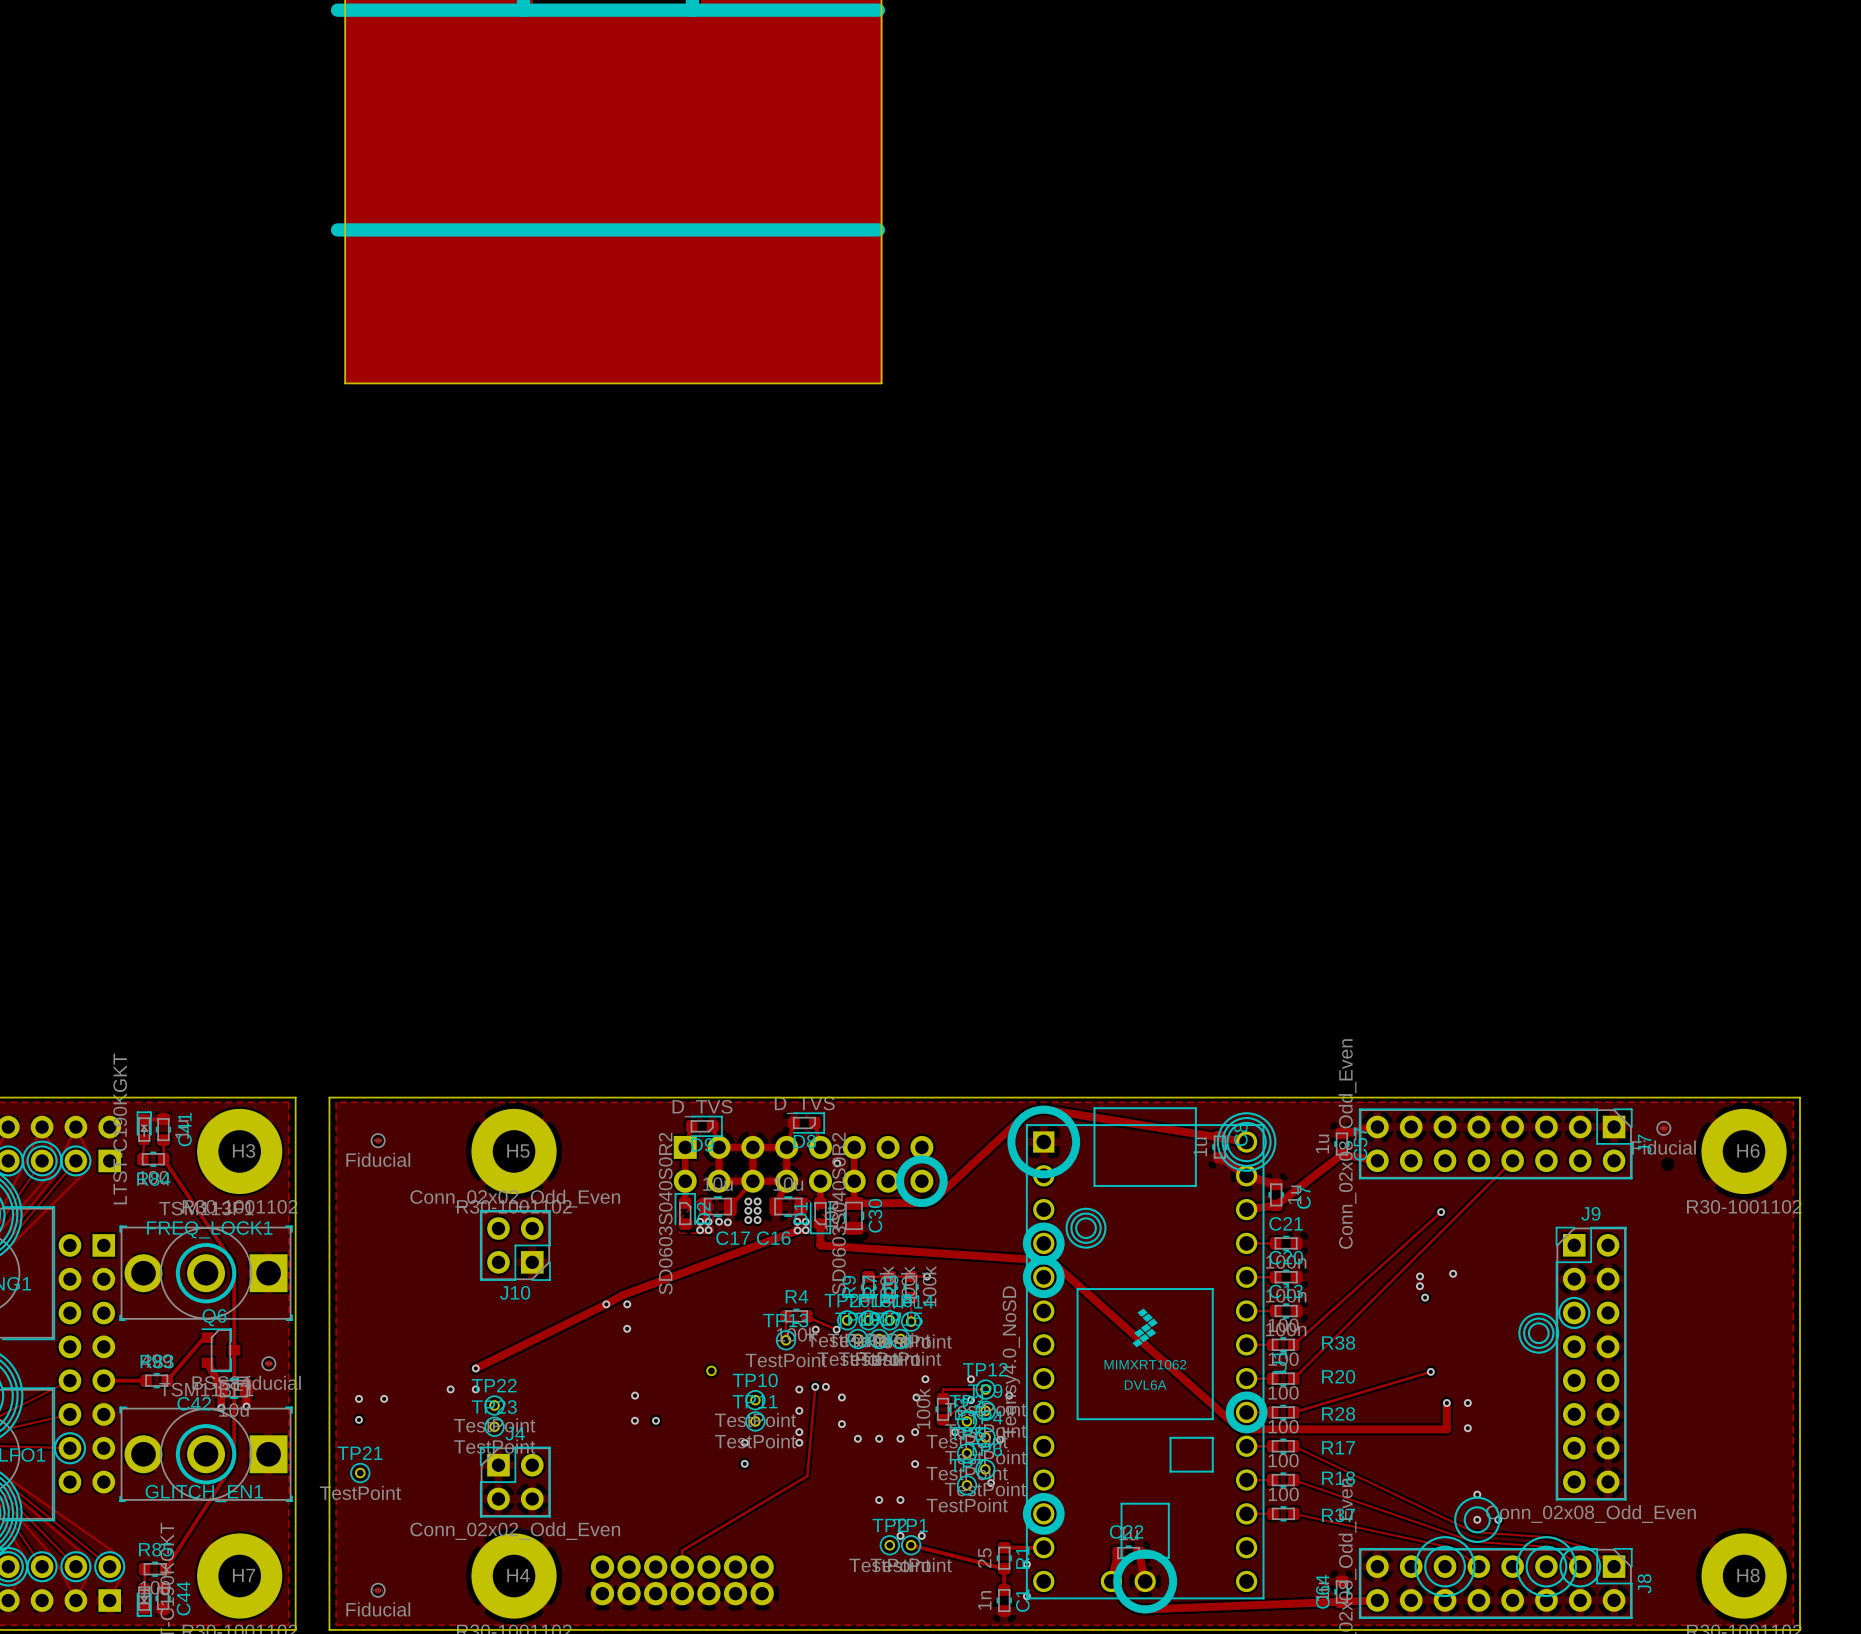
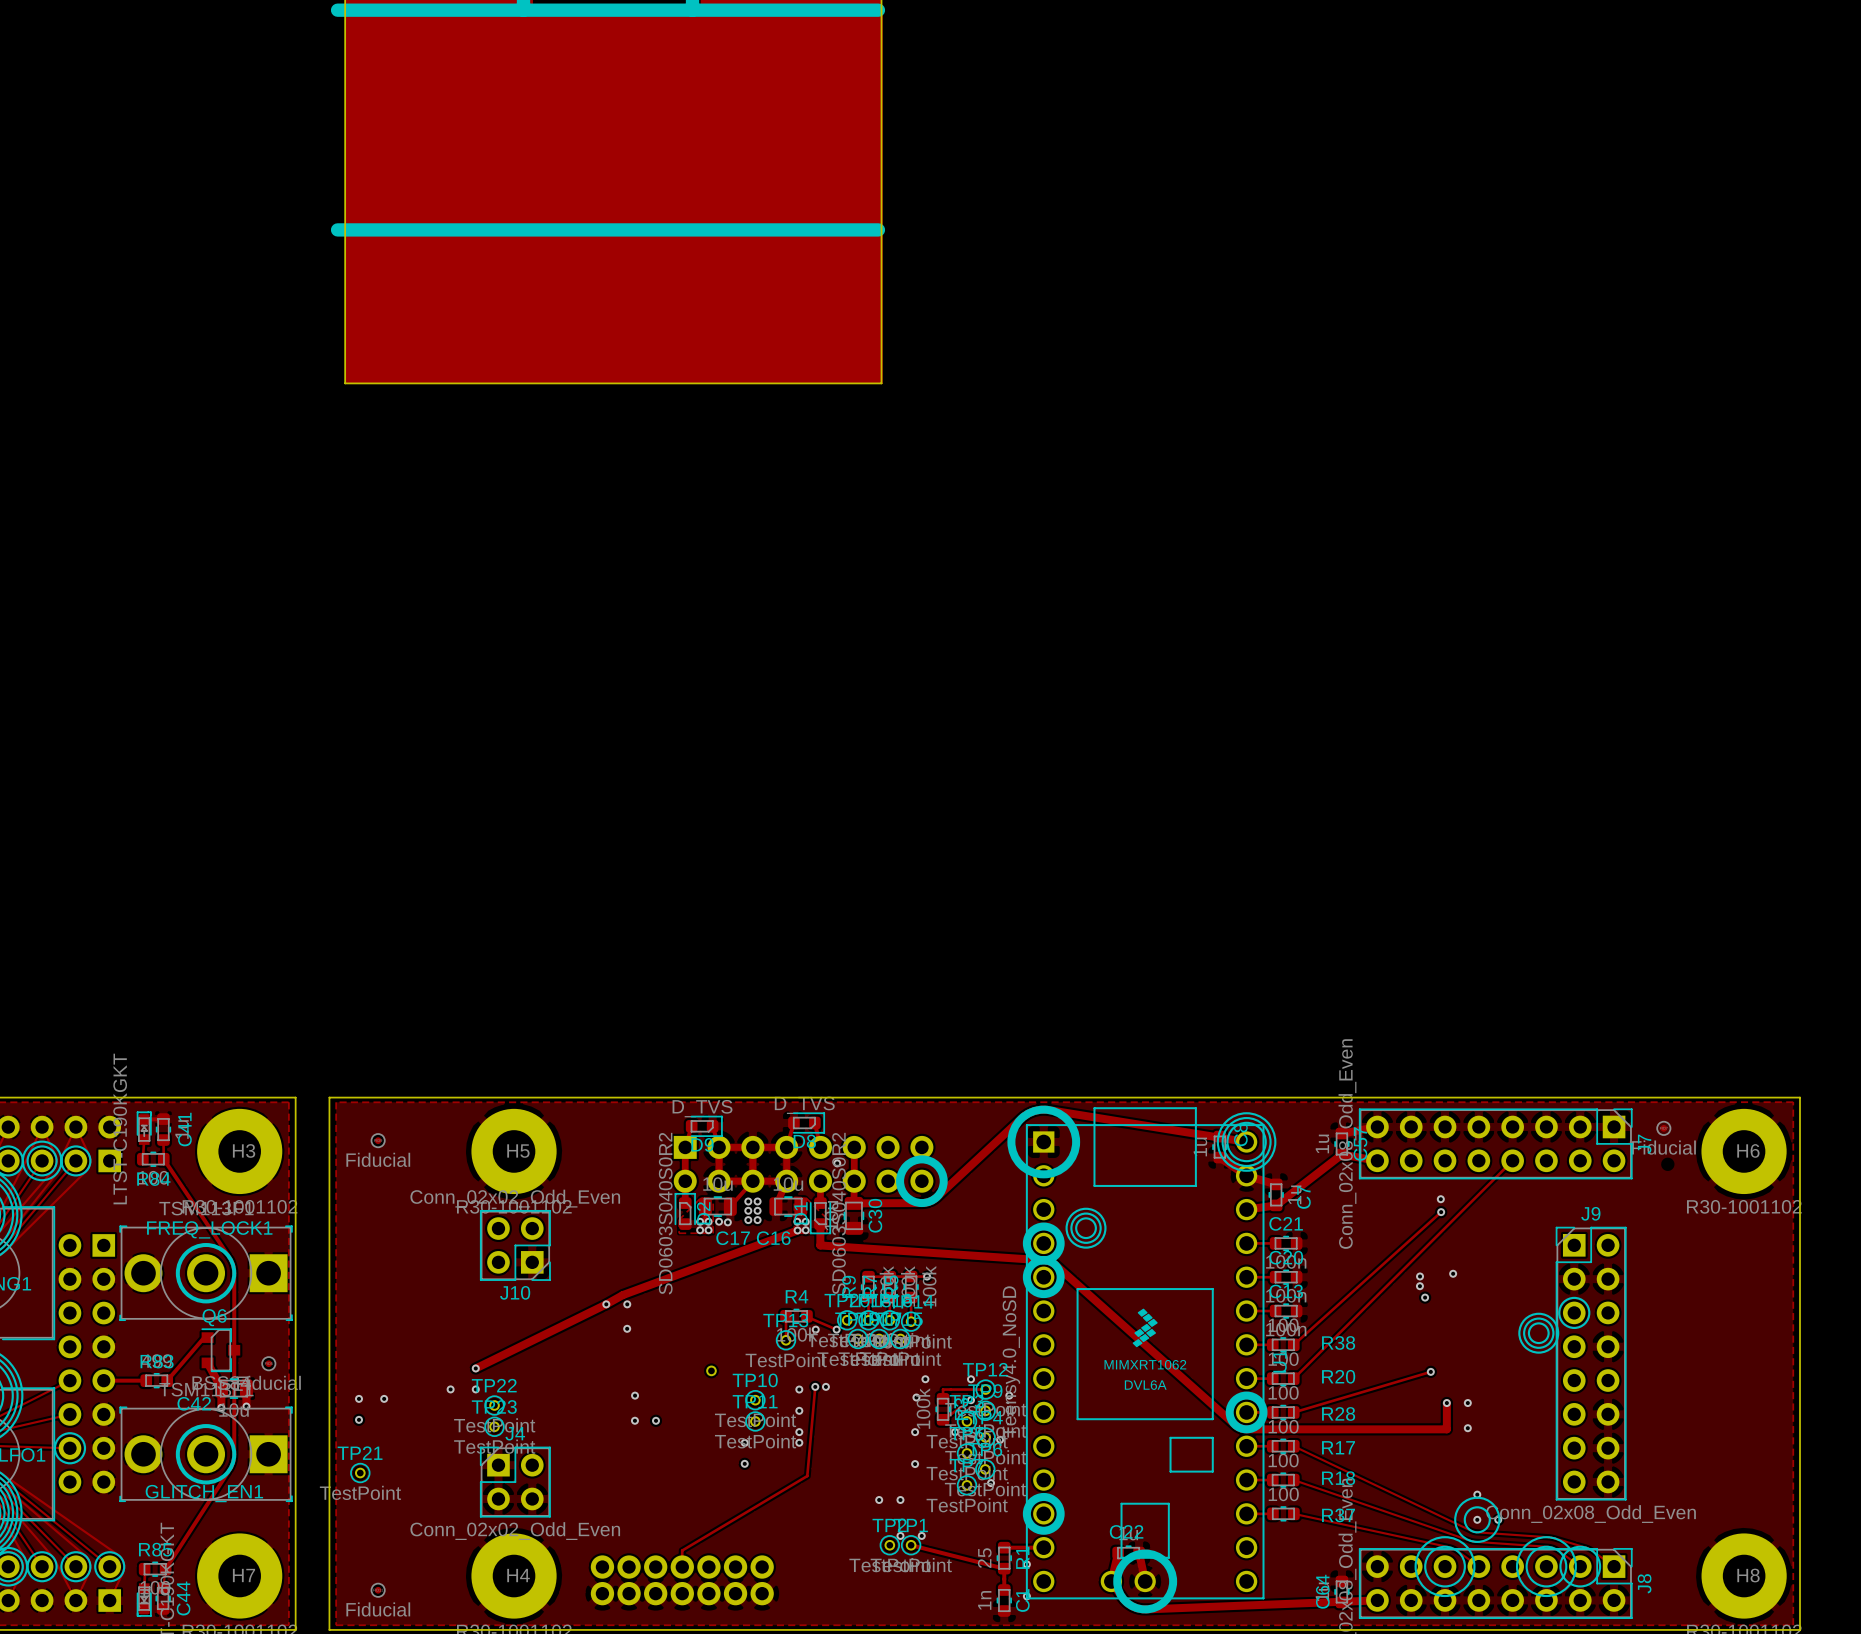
via: none -> (1440, 1199)
via: (841, 1397) -> none
via: (841, 1424) -> none
via: (857, 1438) -> none
via: (879, 1438) -> none
via: (900, 1438) -> none

